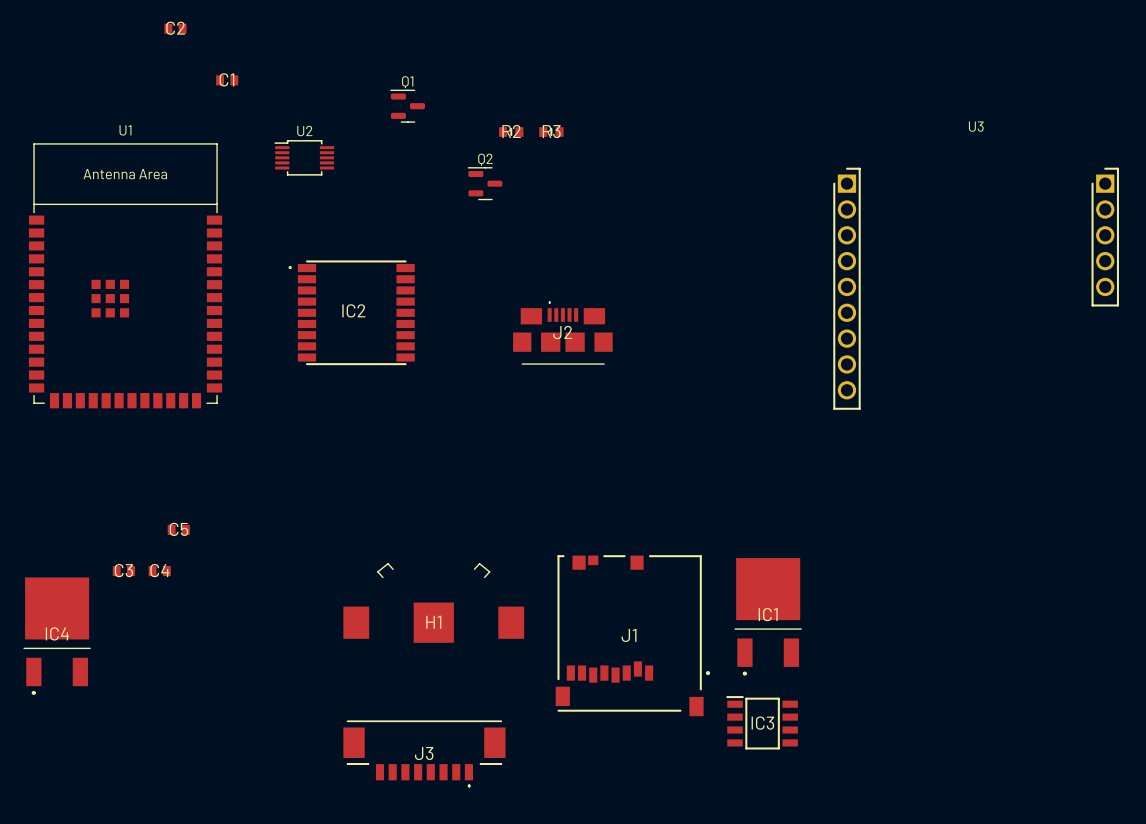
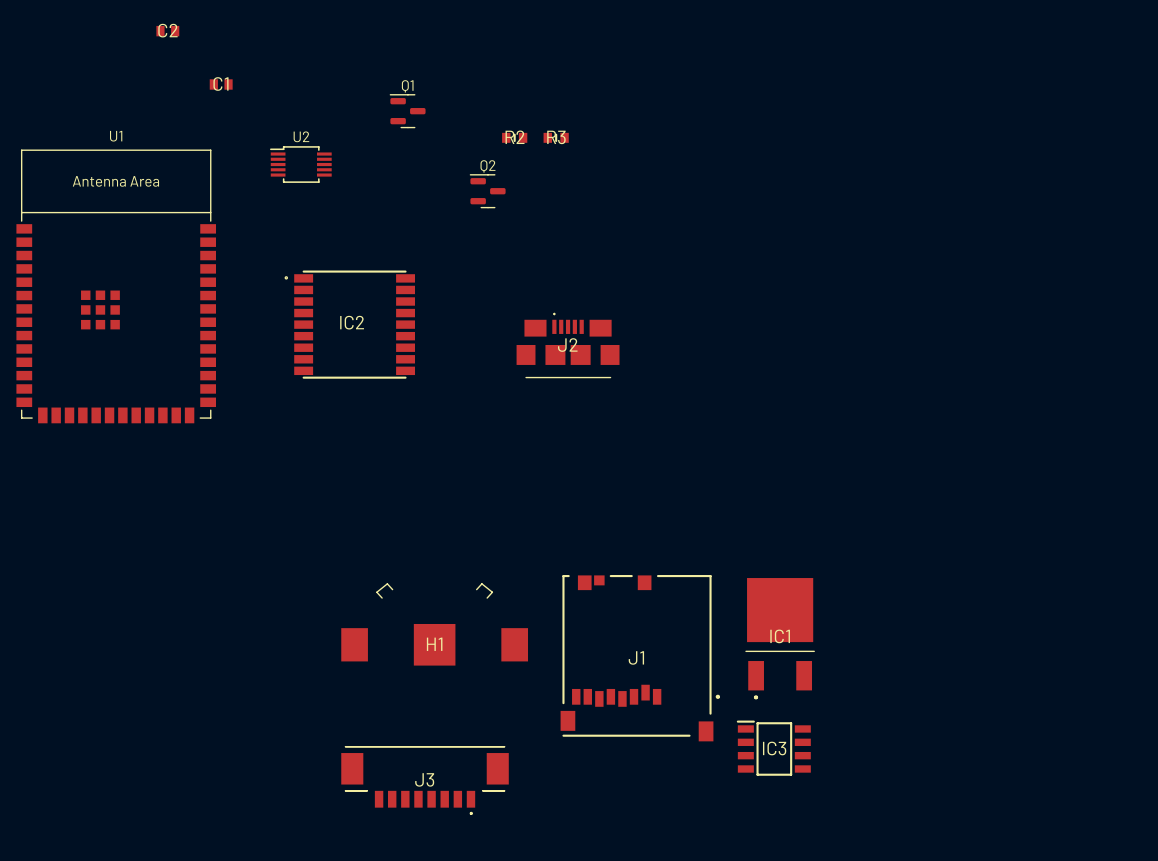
U3: (976, 288) -> none
C5: (178, 529) -> none
C3: (123, 571) -> none
C4: (159, 571) -> none
IC4: (57, 636) -> none

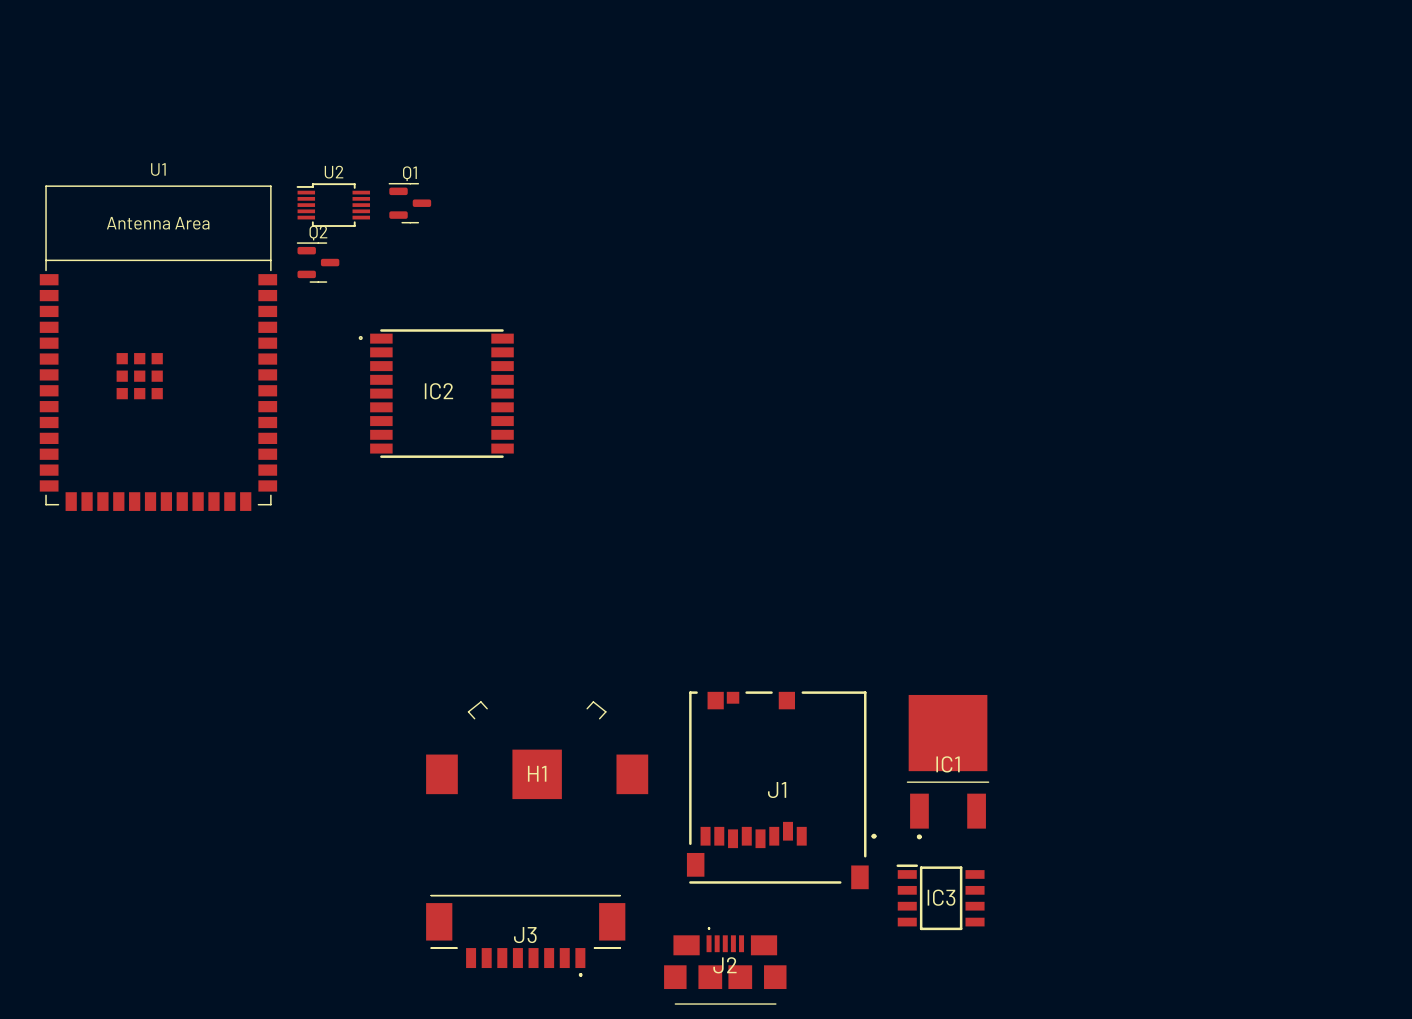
C2: (167, 31) -> none
C1: (221, 84) -> none
Q1 position: (407, 111) -> (409, 203)
R2: (514, 137) -> none
R3: (556, 137) -> none
U2 position: (300, 164) -> (333, 205)
Q2 position: (487, 191) -> (318, 262)
J2 position: (568, 345) -> (725, 965)

